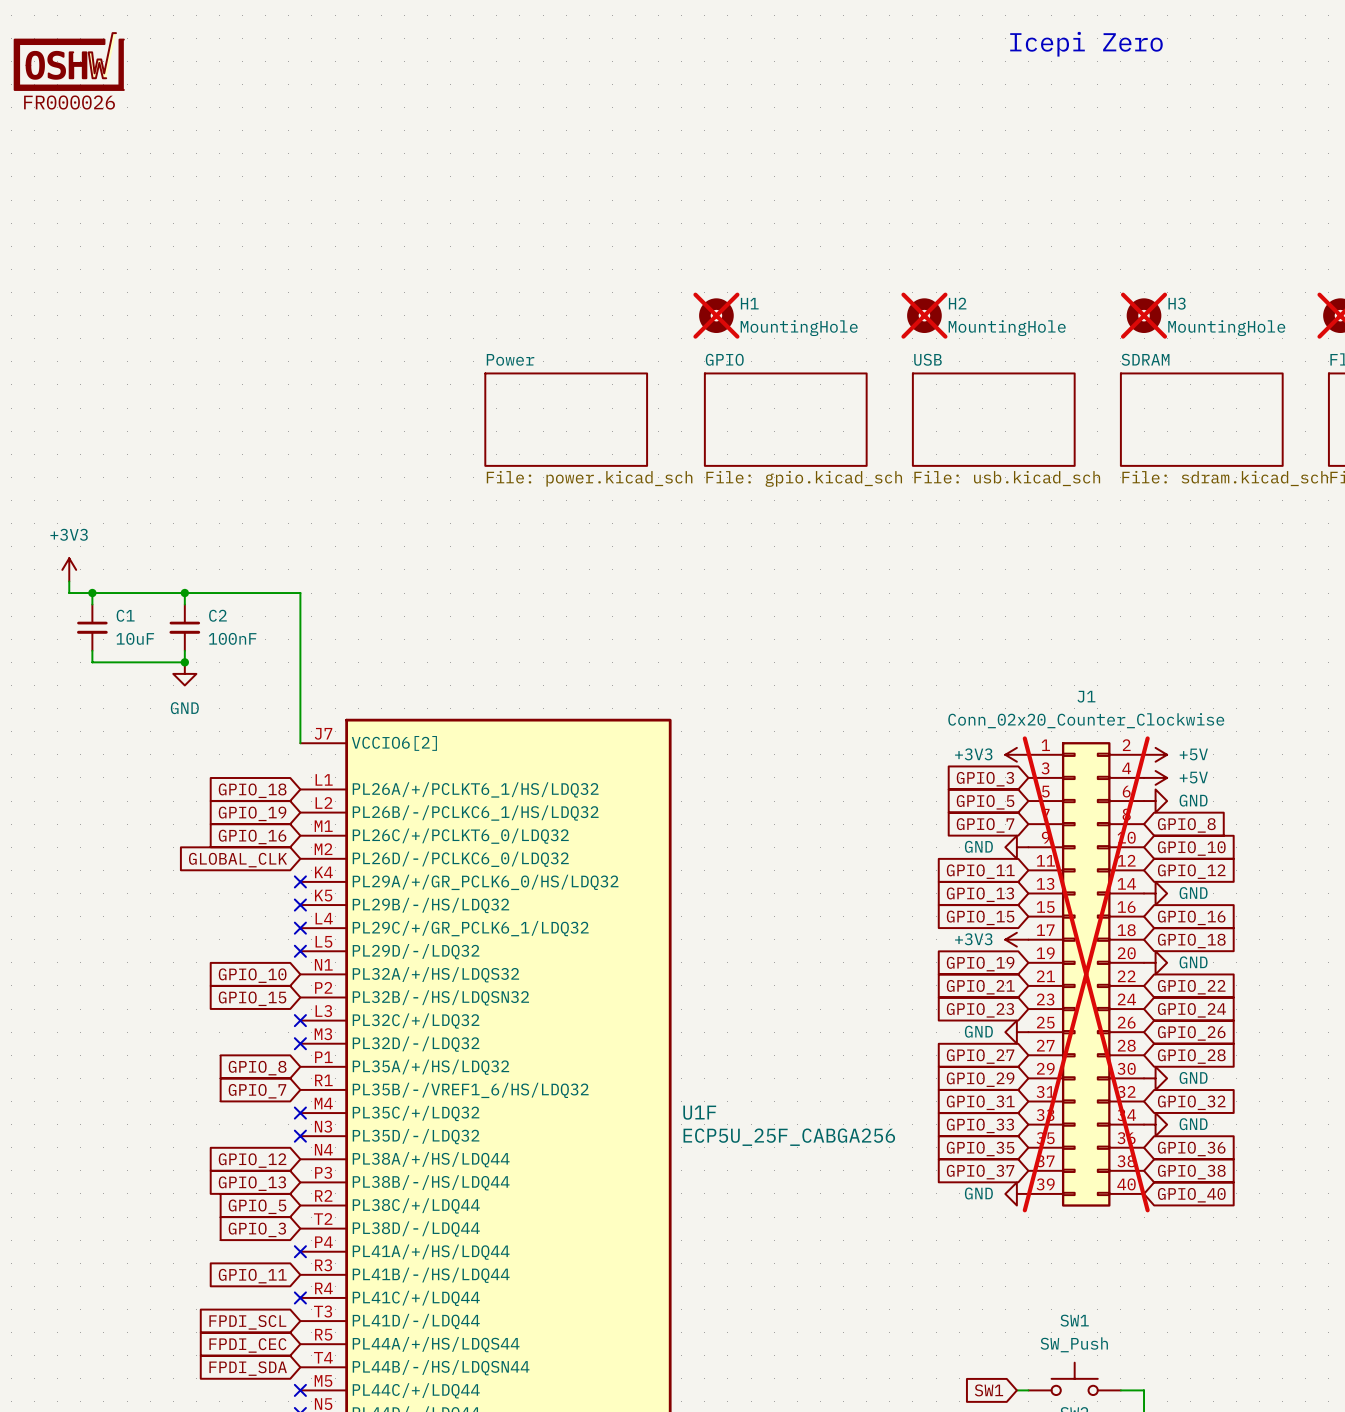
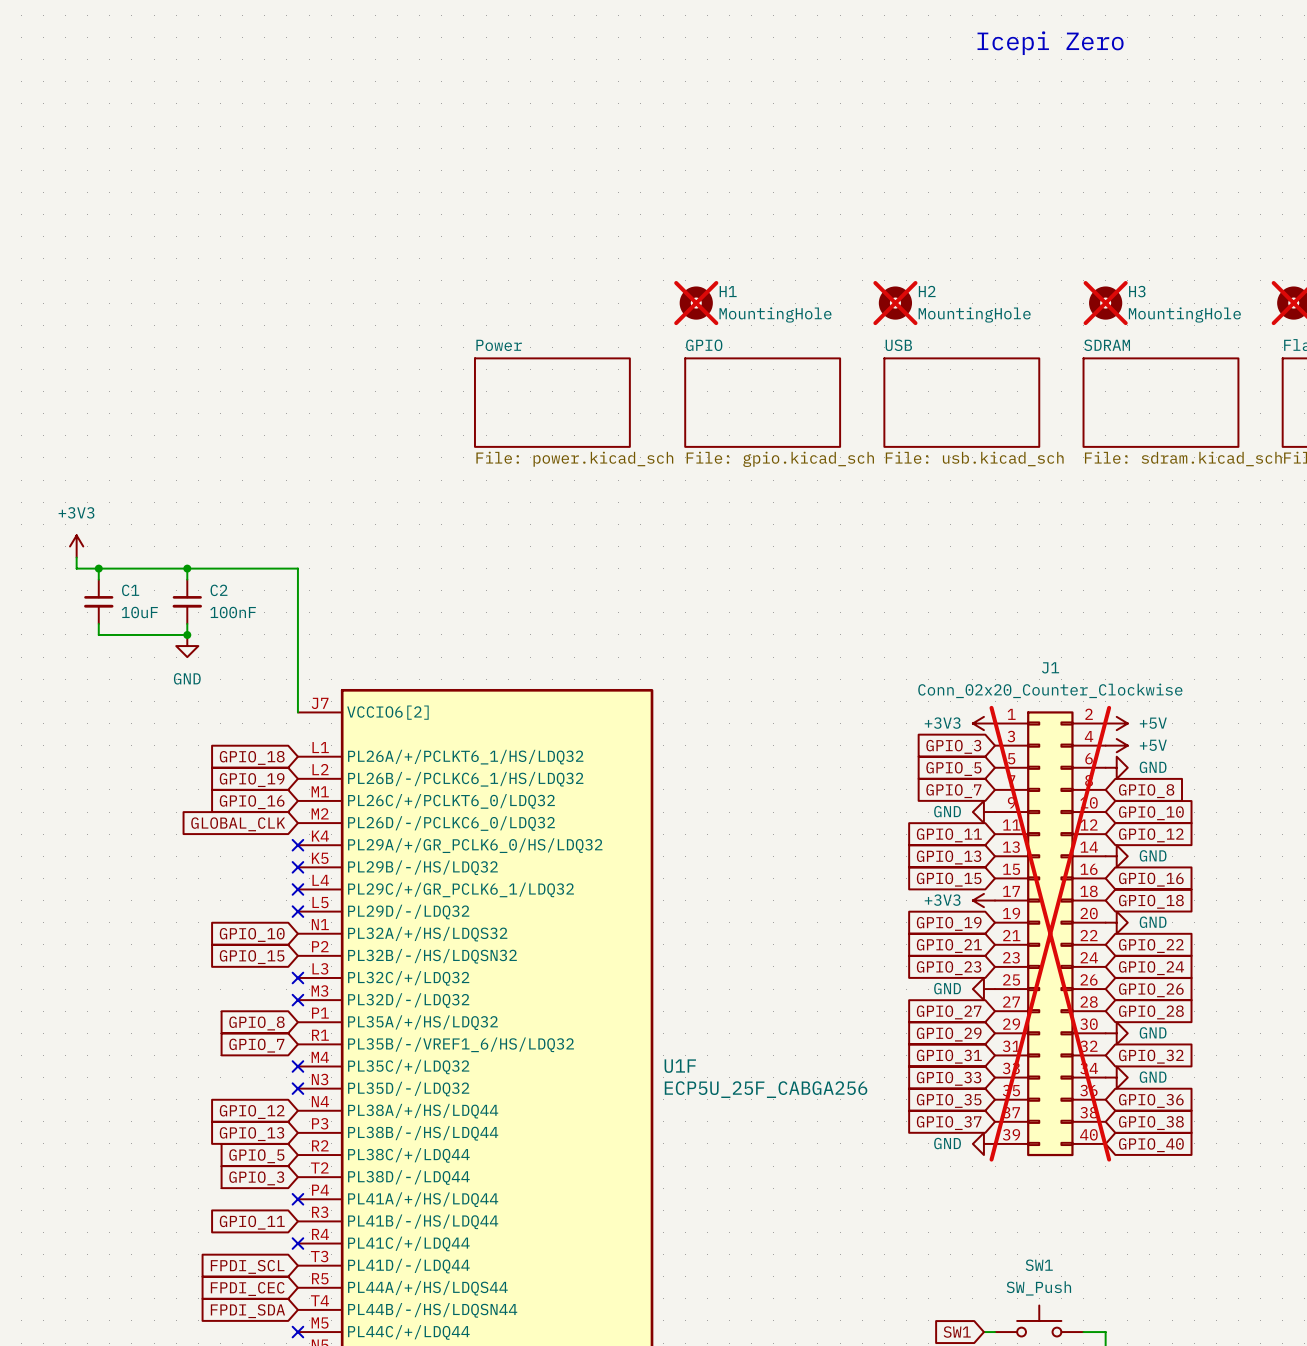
part: (69, 61) -> none

